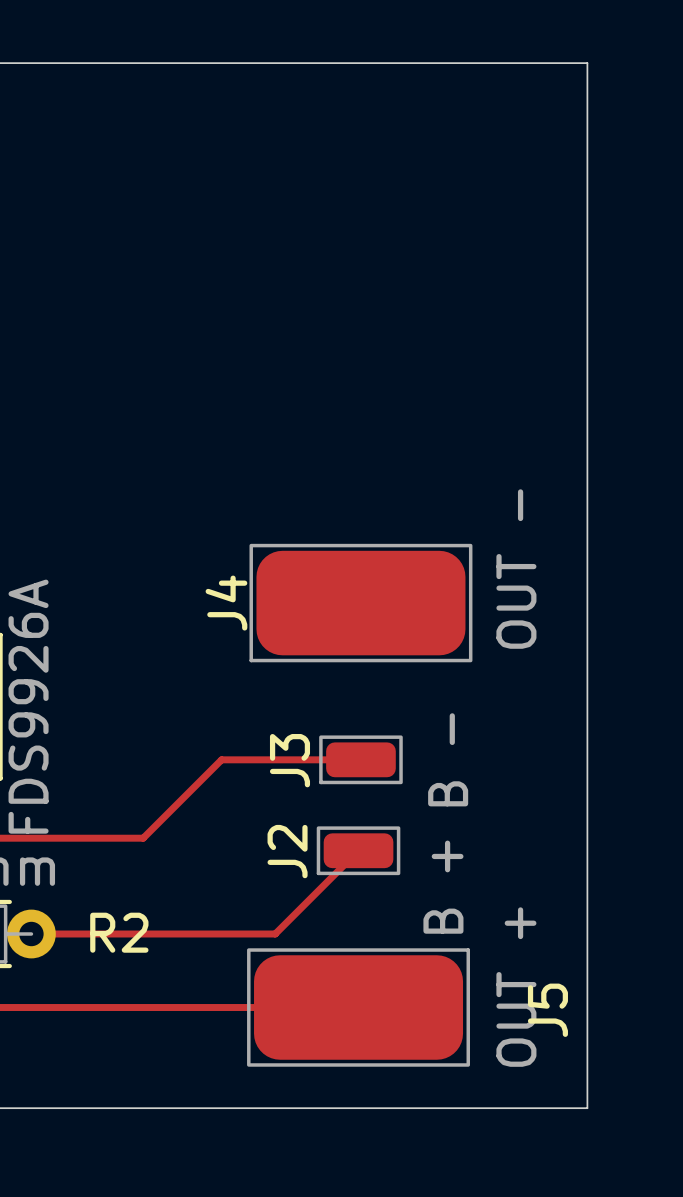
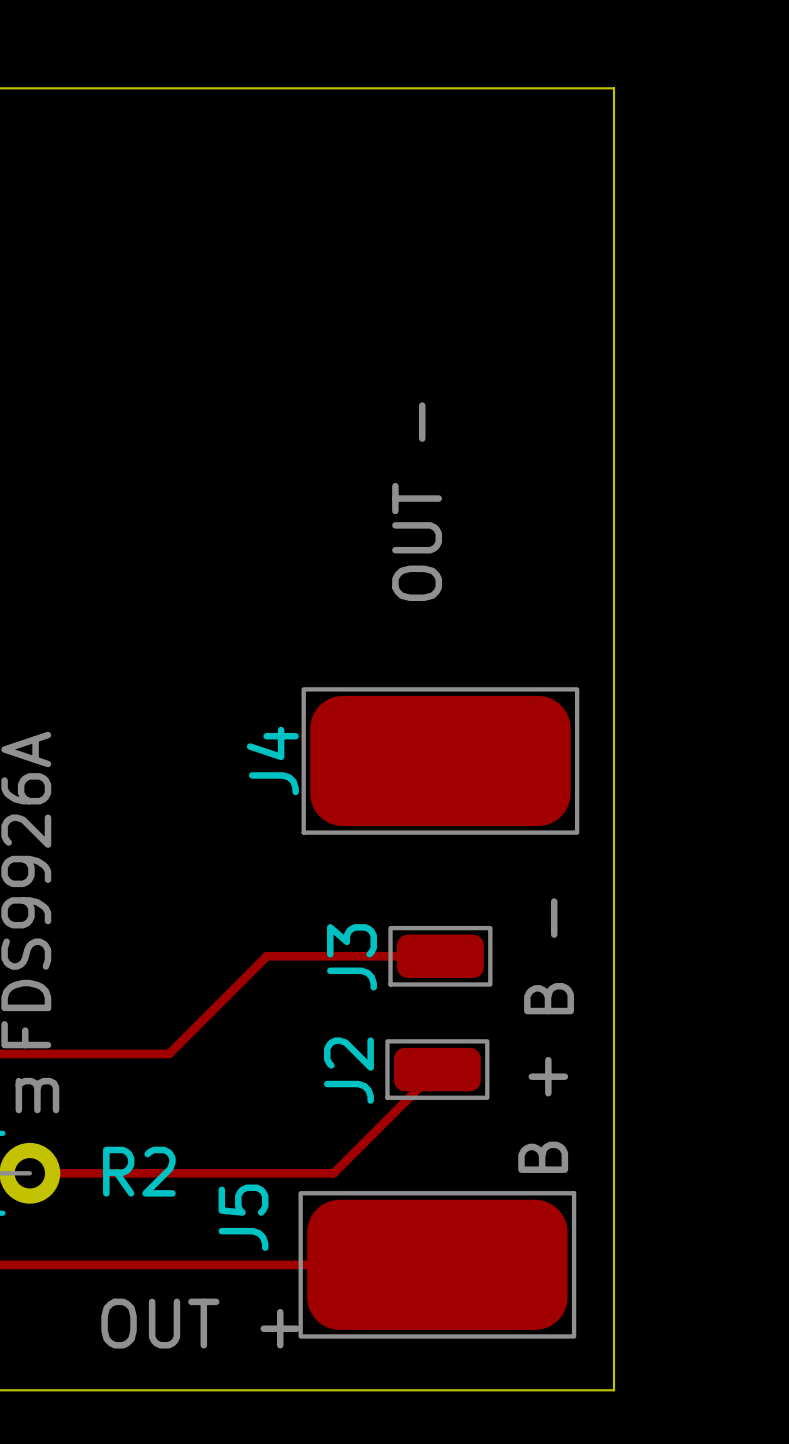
board edge: (500, 63) (587, 63) (587, 1108) (500, 1108) -> (614, 88) (614, 1390)
J4 value position: OUT - (516, 569) -> OUT - (417, 501)
J5 value rotation: 0° (516, 987) -> 90° clockwise (200, 1323)
J5 value position: OUT + (516, 987) -> OUT + (200, 1323)
J5 name position: J5 (547, 1010) -> J5 (243, 1217)

